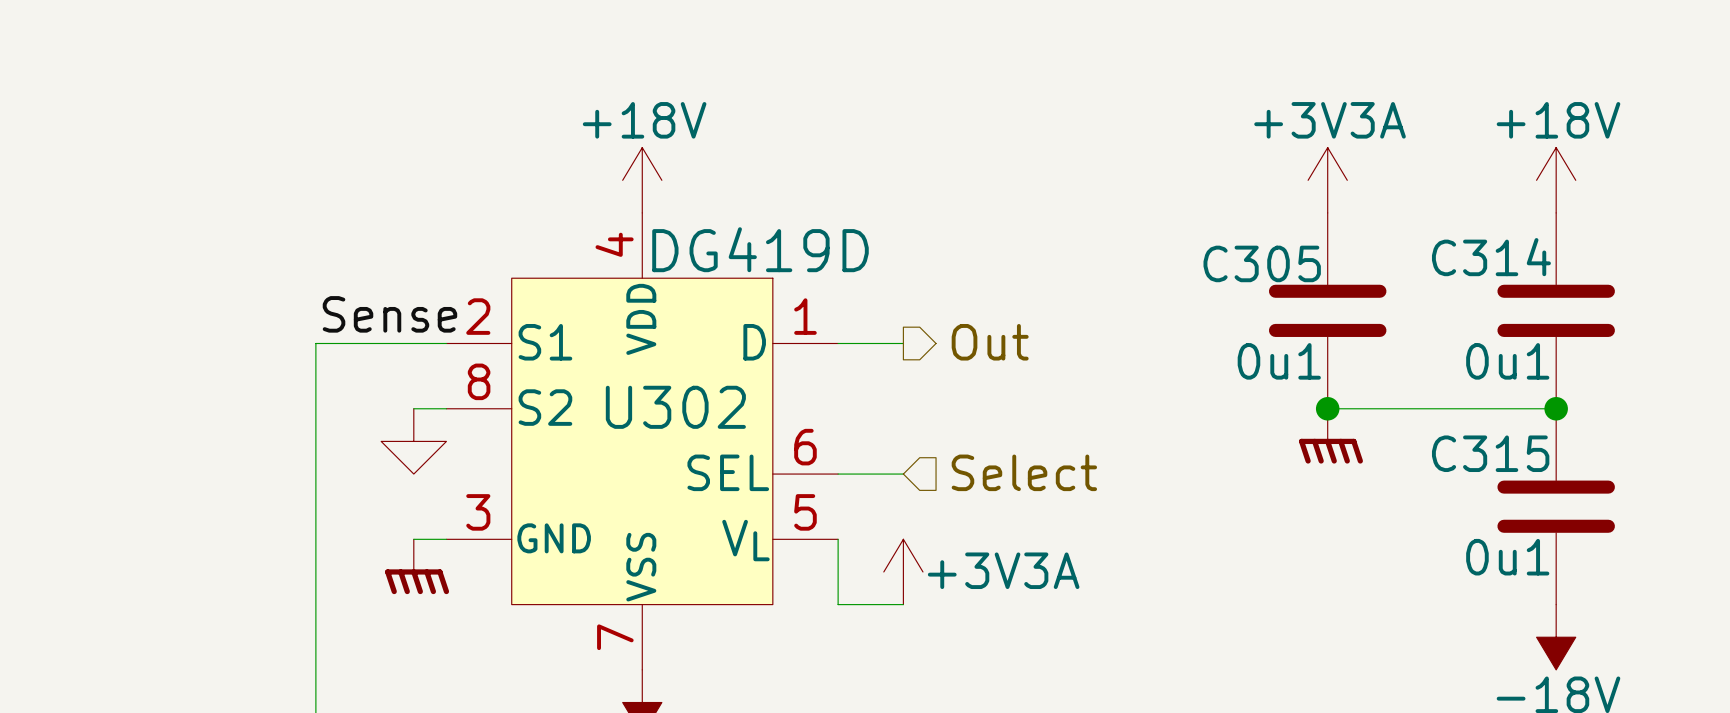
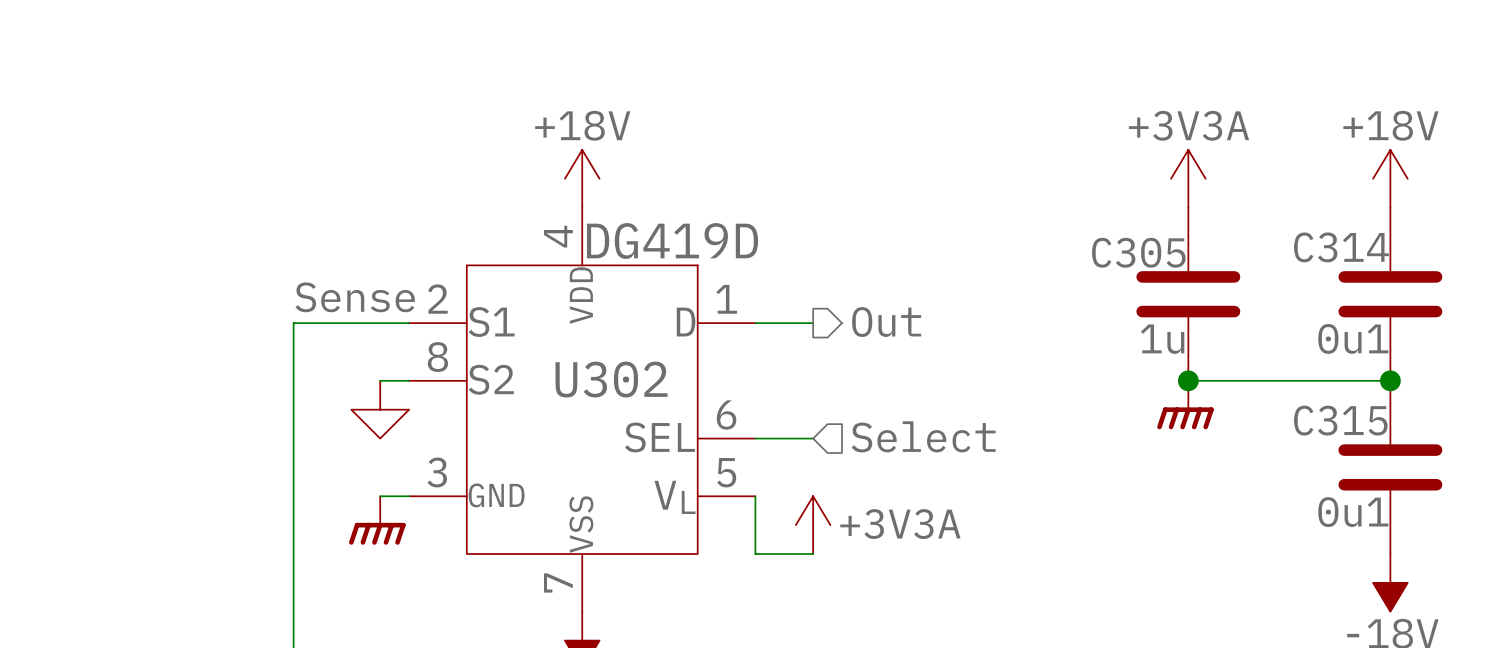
C305 value: 0u1 (1279, 361) -> 1u (1162, 339)
power symbol flip: as is (1330, 436) -> left-right (1185, 405)
power symbol flip: as is (417, 566) -> left-right (377, 520)

